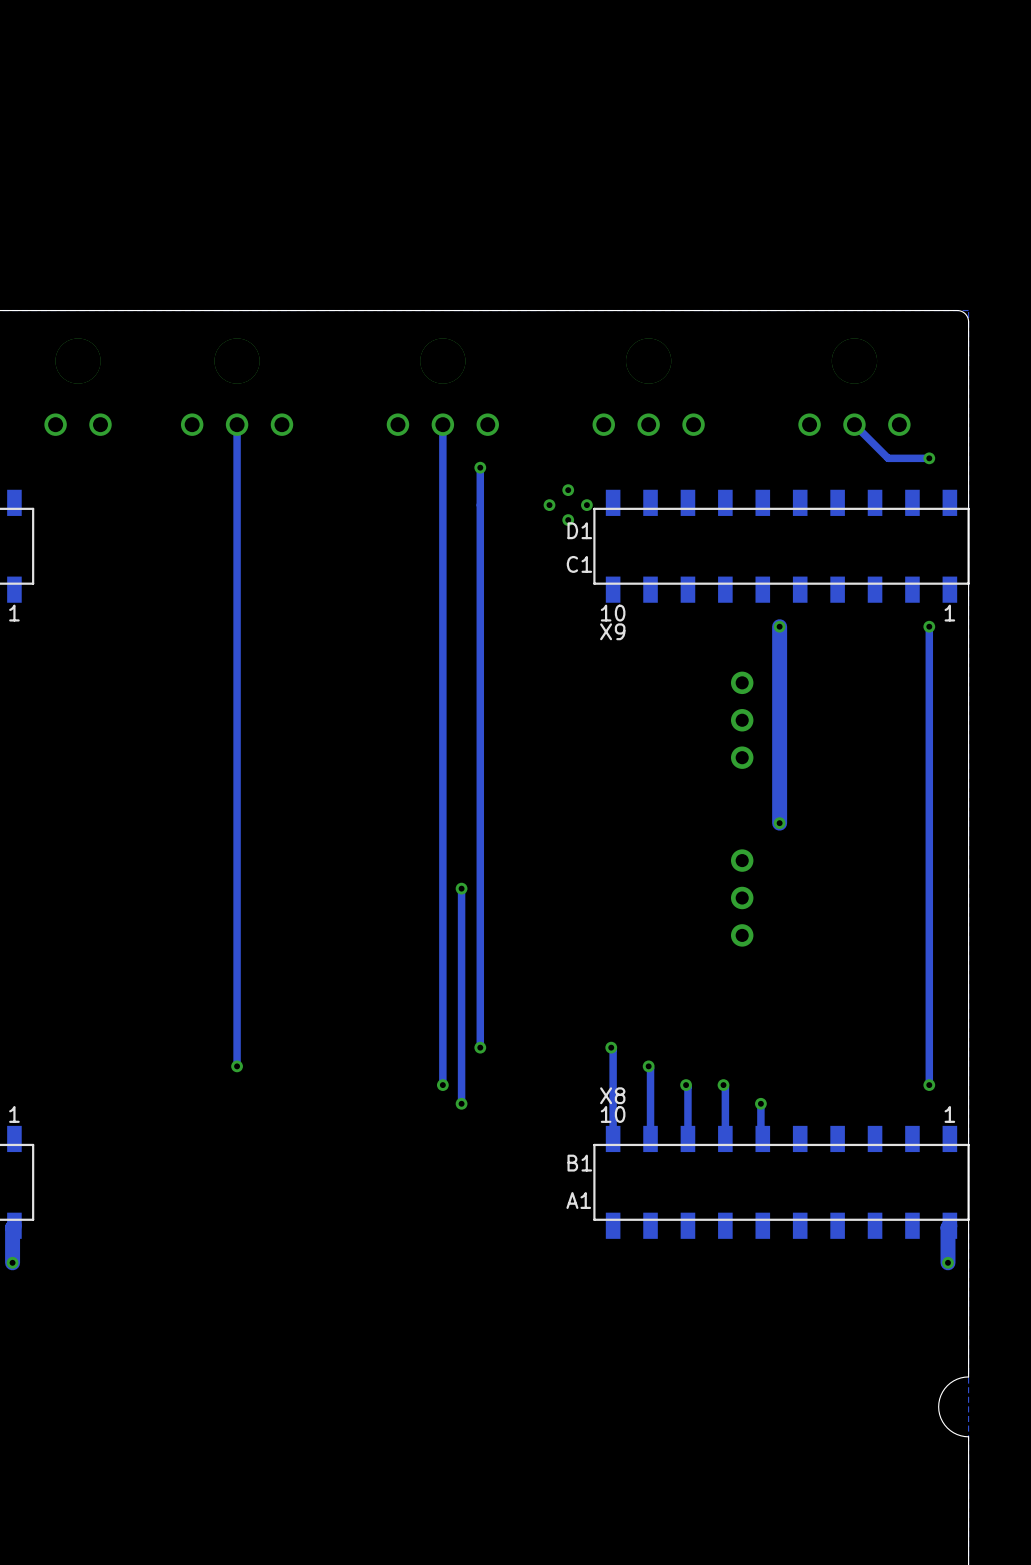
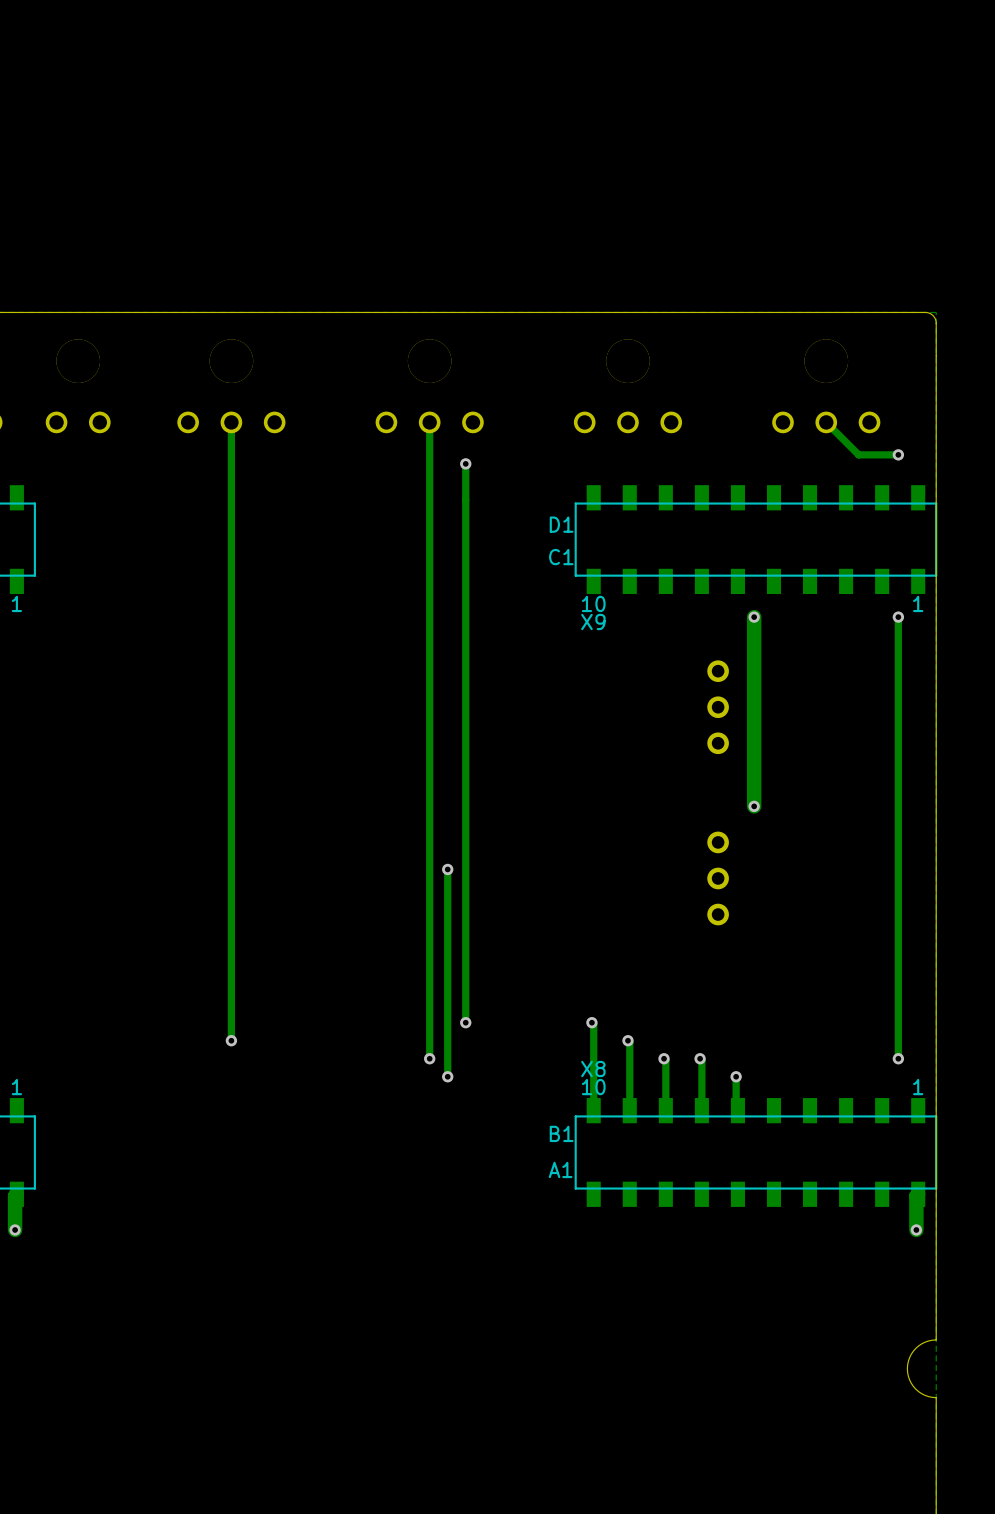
via: (568, 490) -> none
via: (549, 505) -> none
via: (586, 505) -> none
via: (568, 520) -> none

